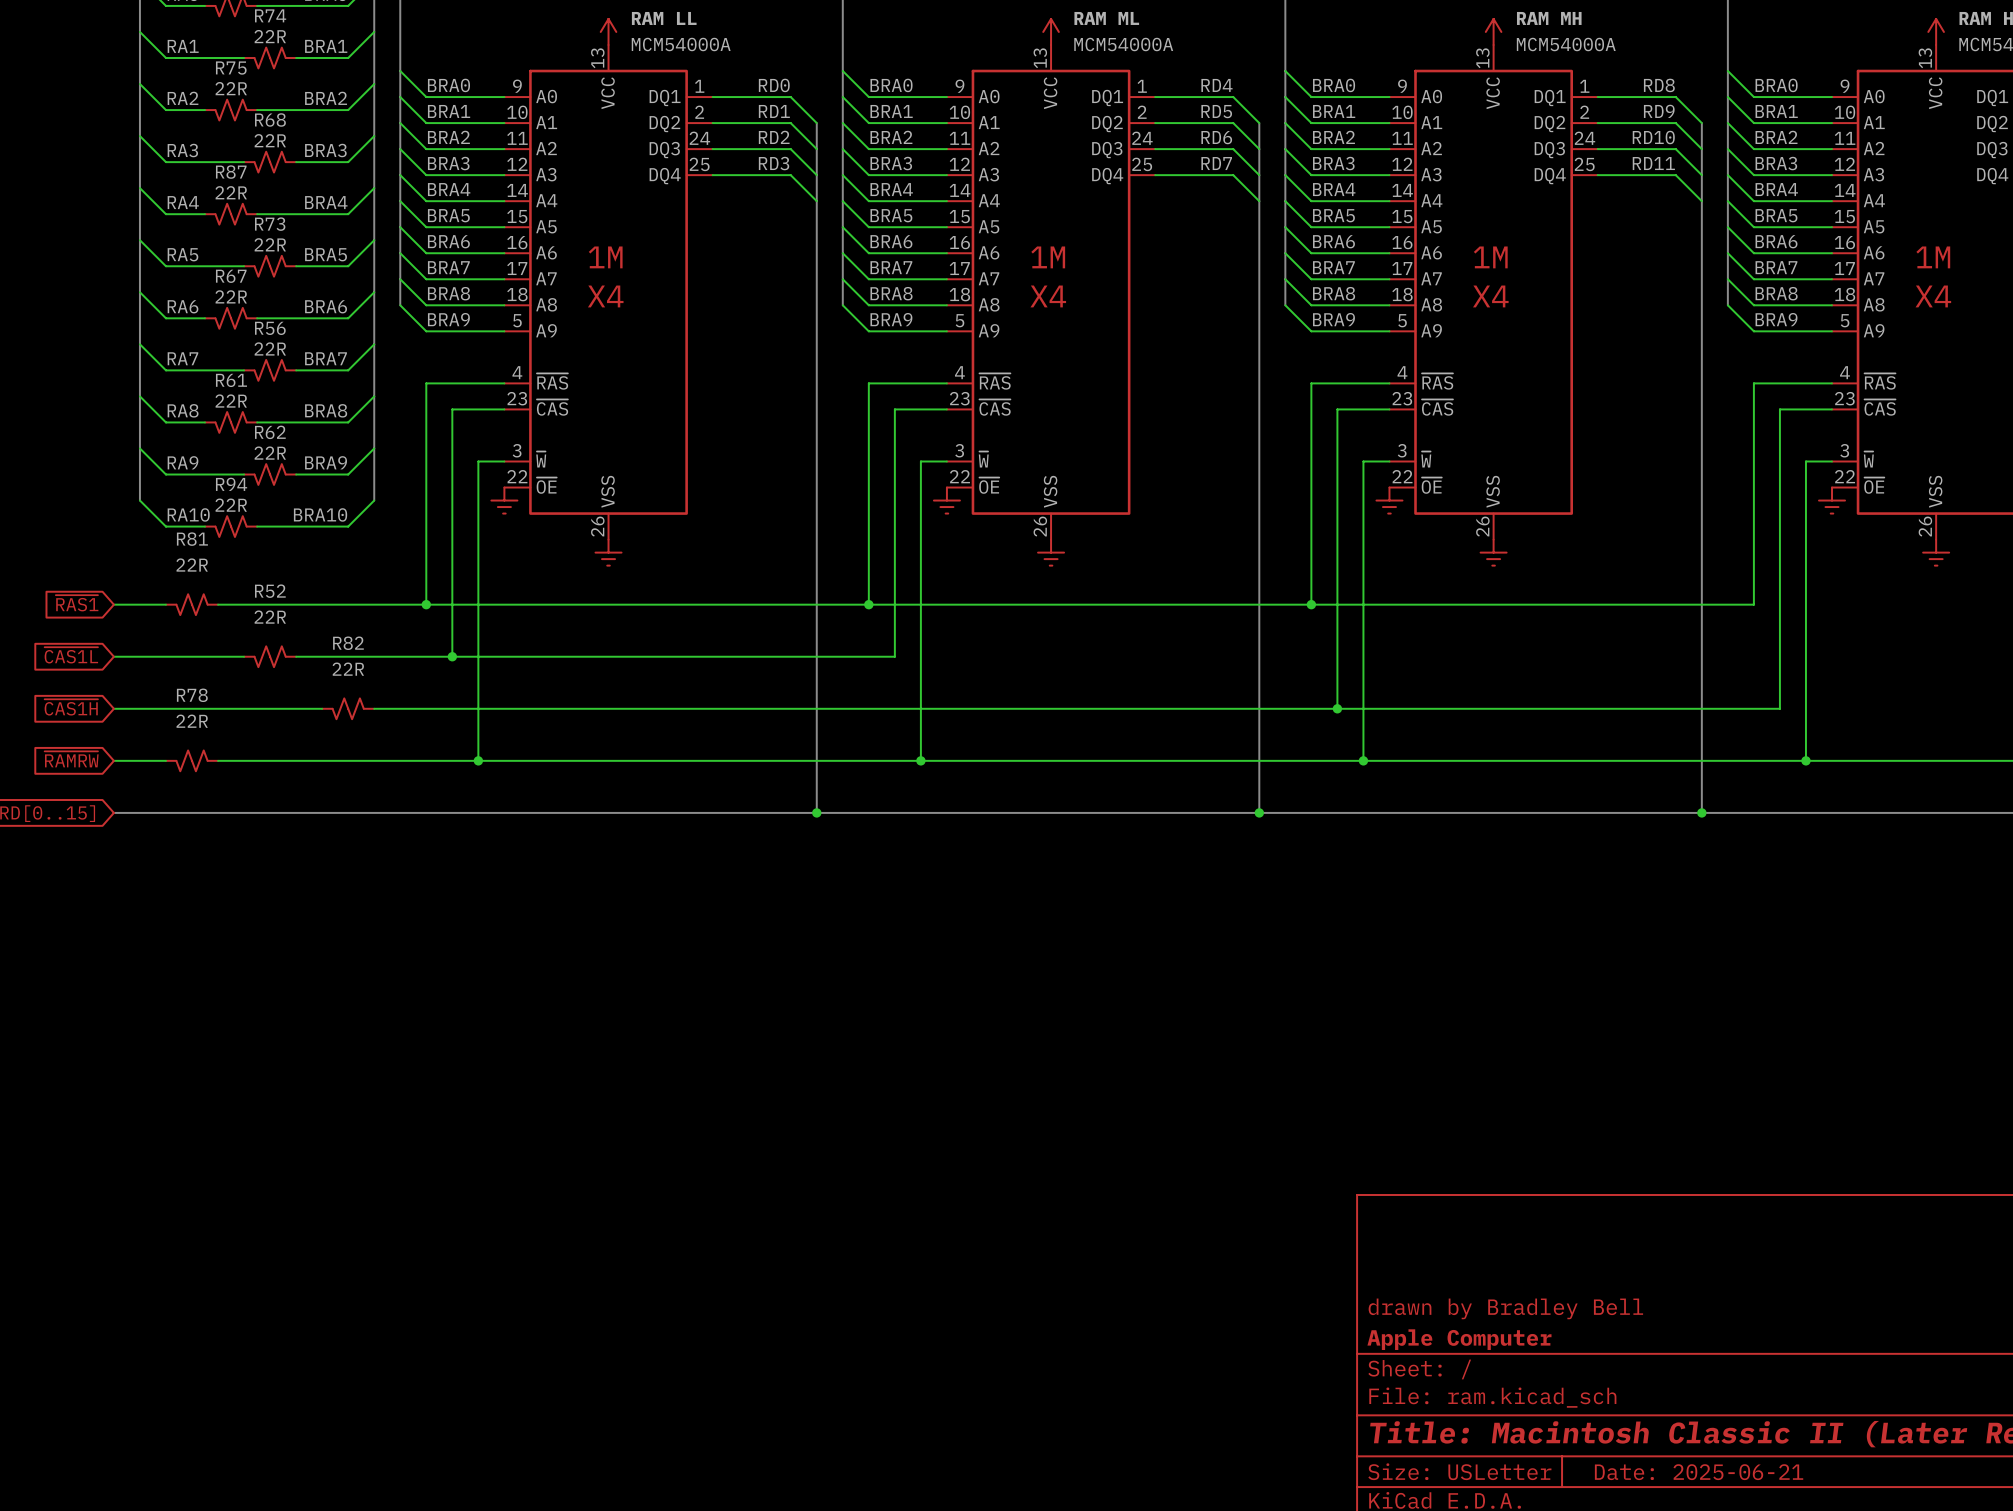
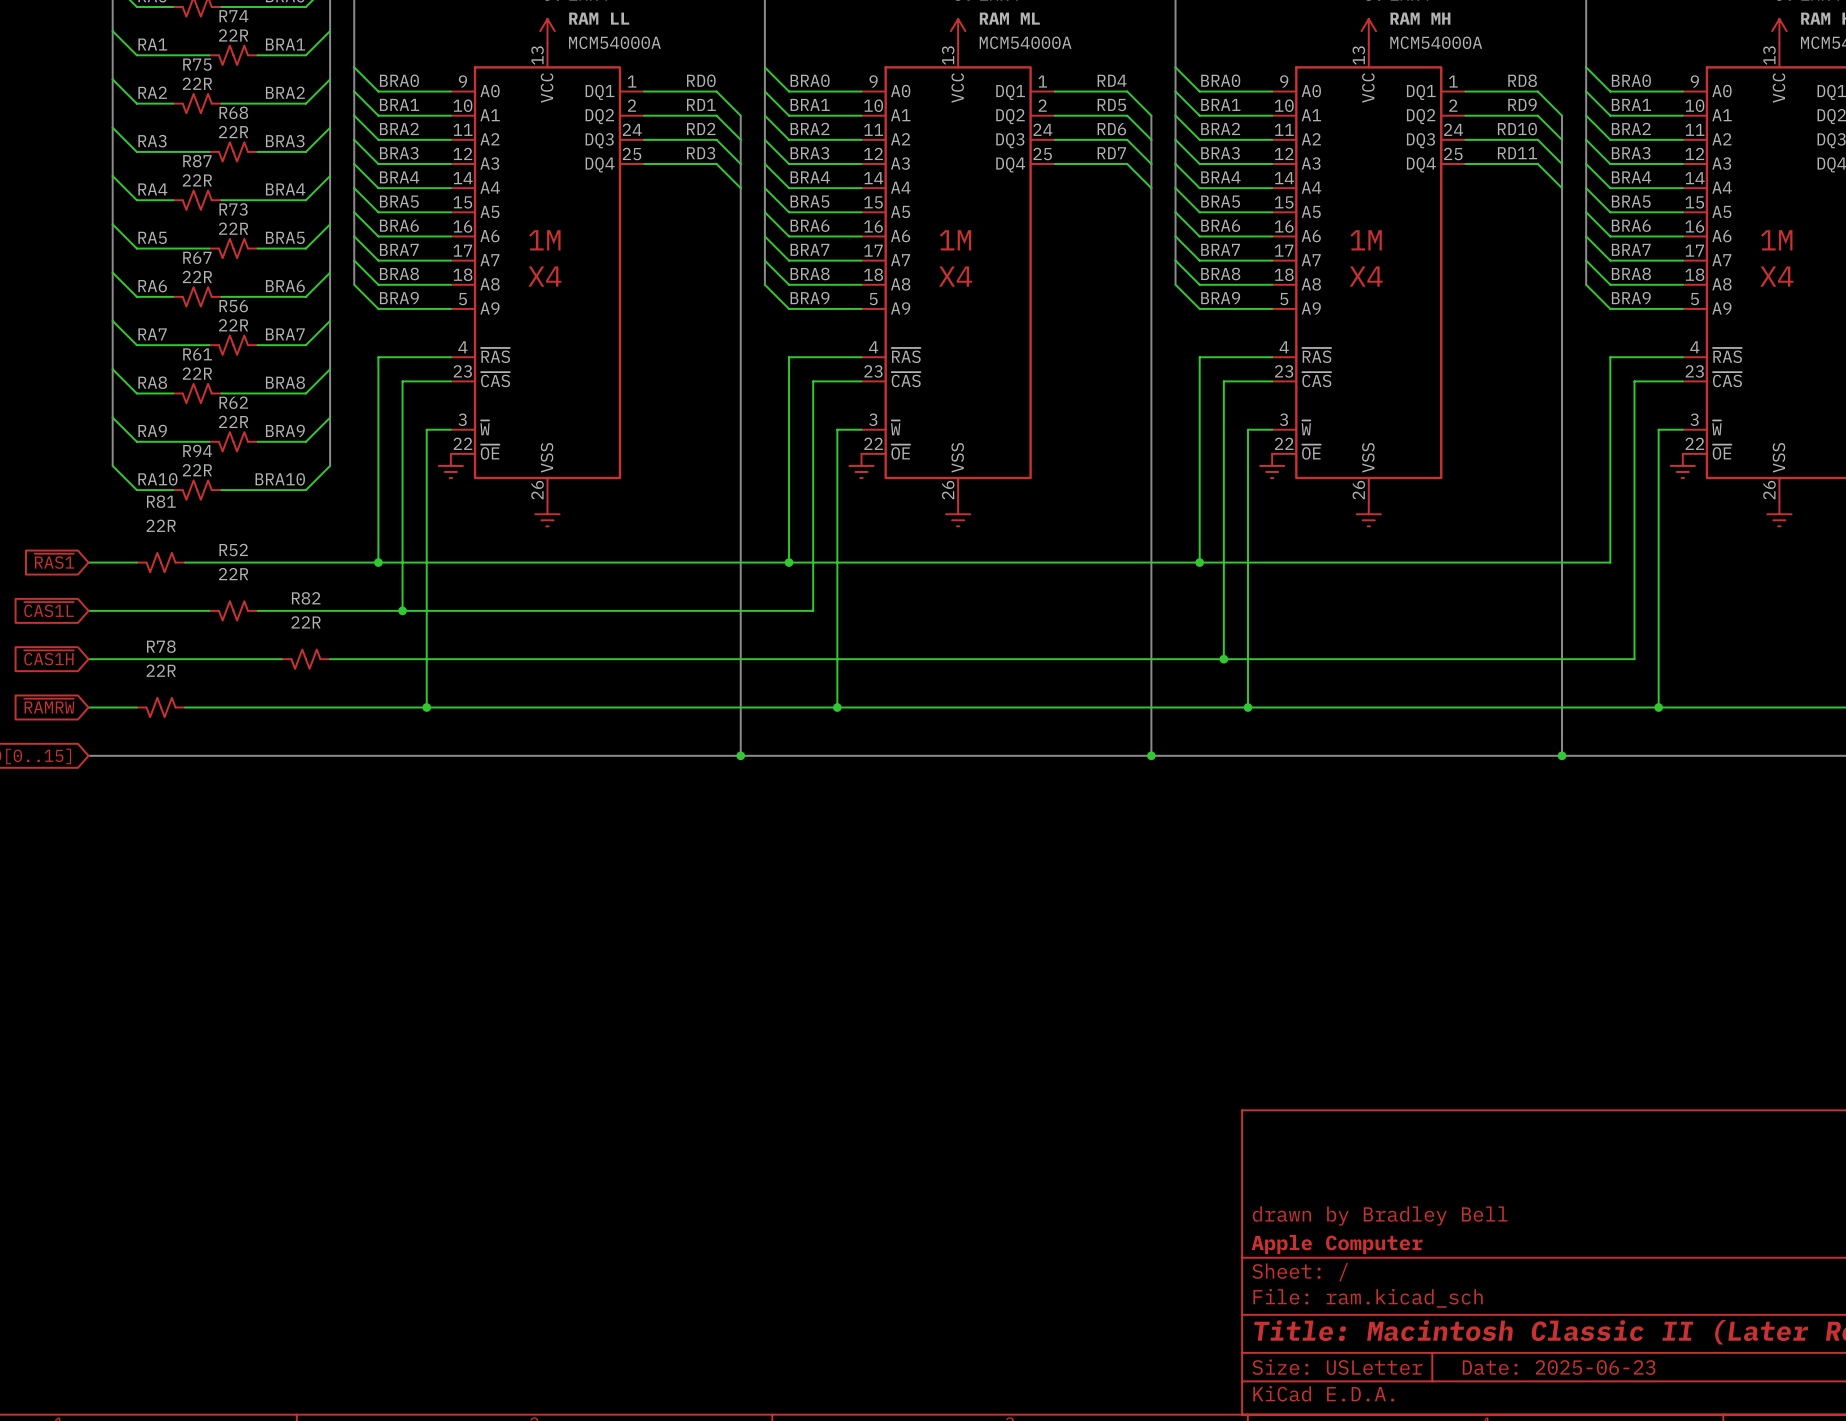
title block: Date: 2025-06-21 (1699, 1472) -> Date: 2025-06-23 (1559, 1367)

